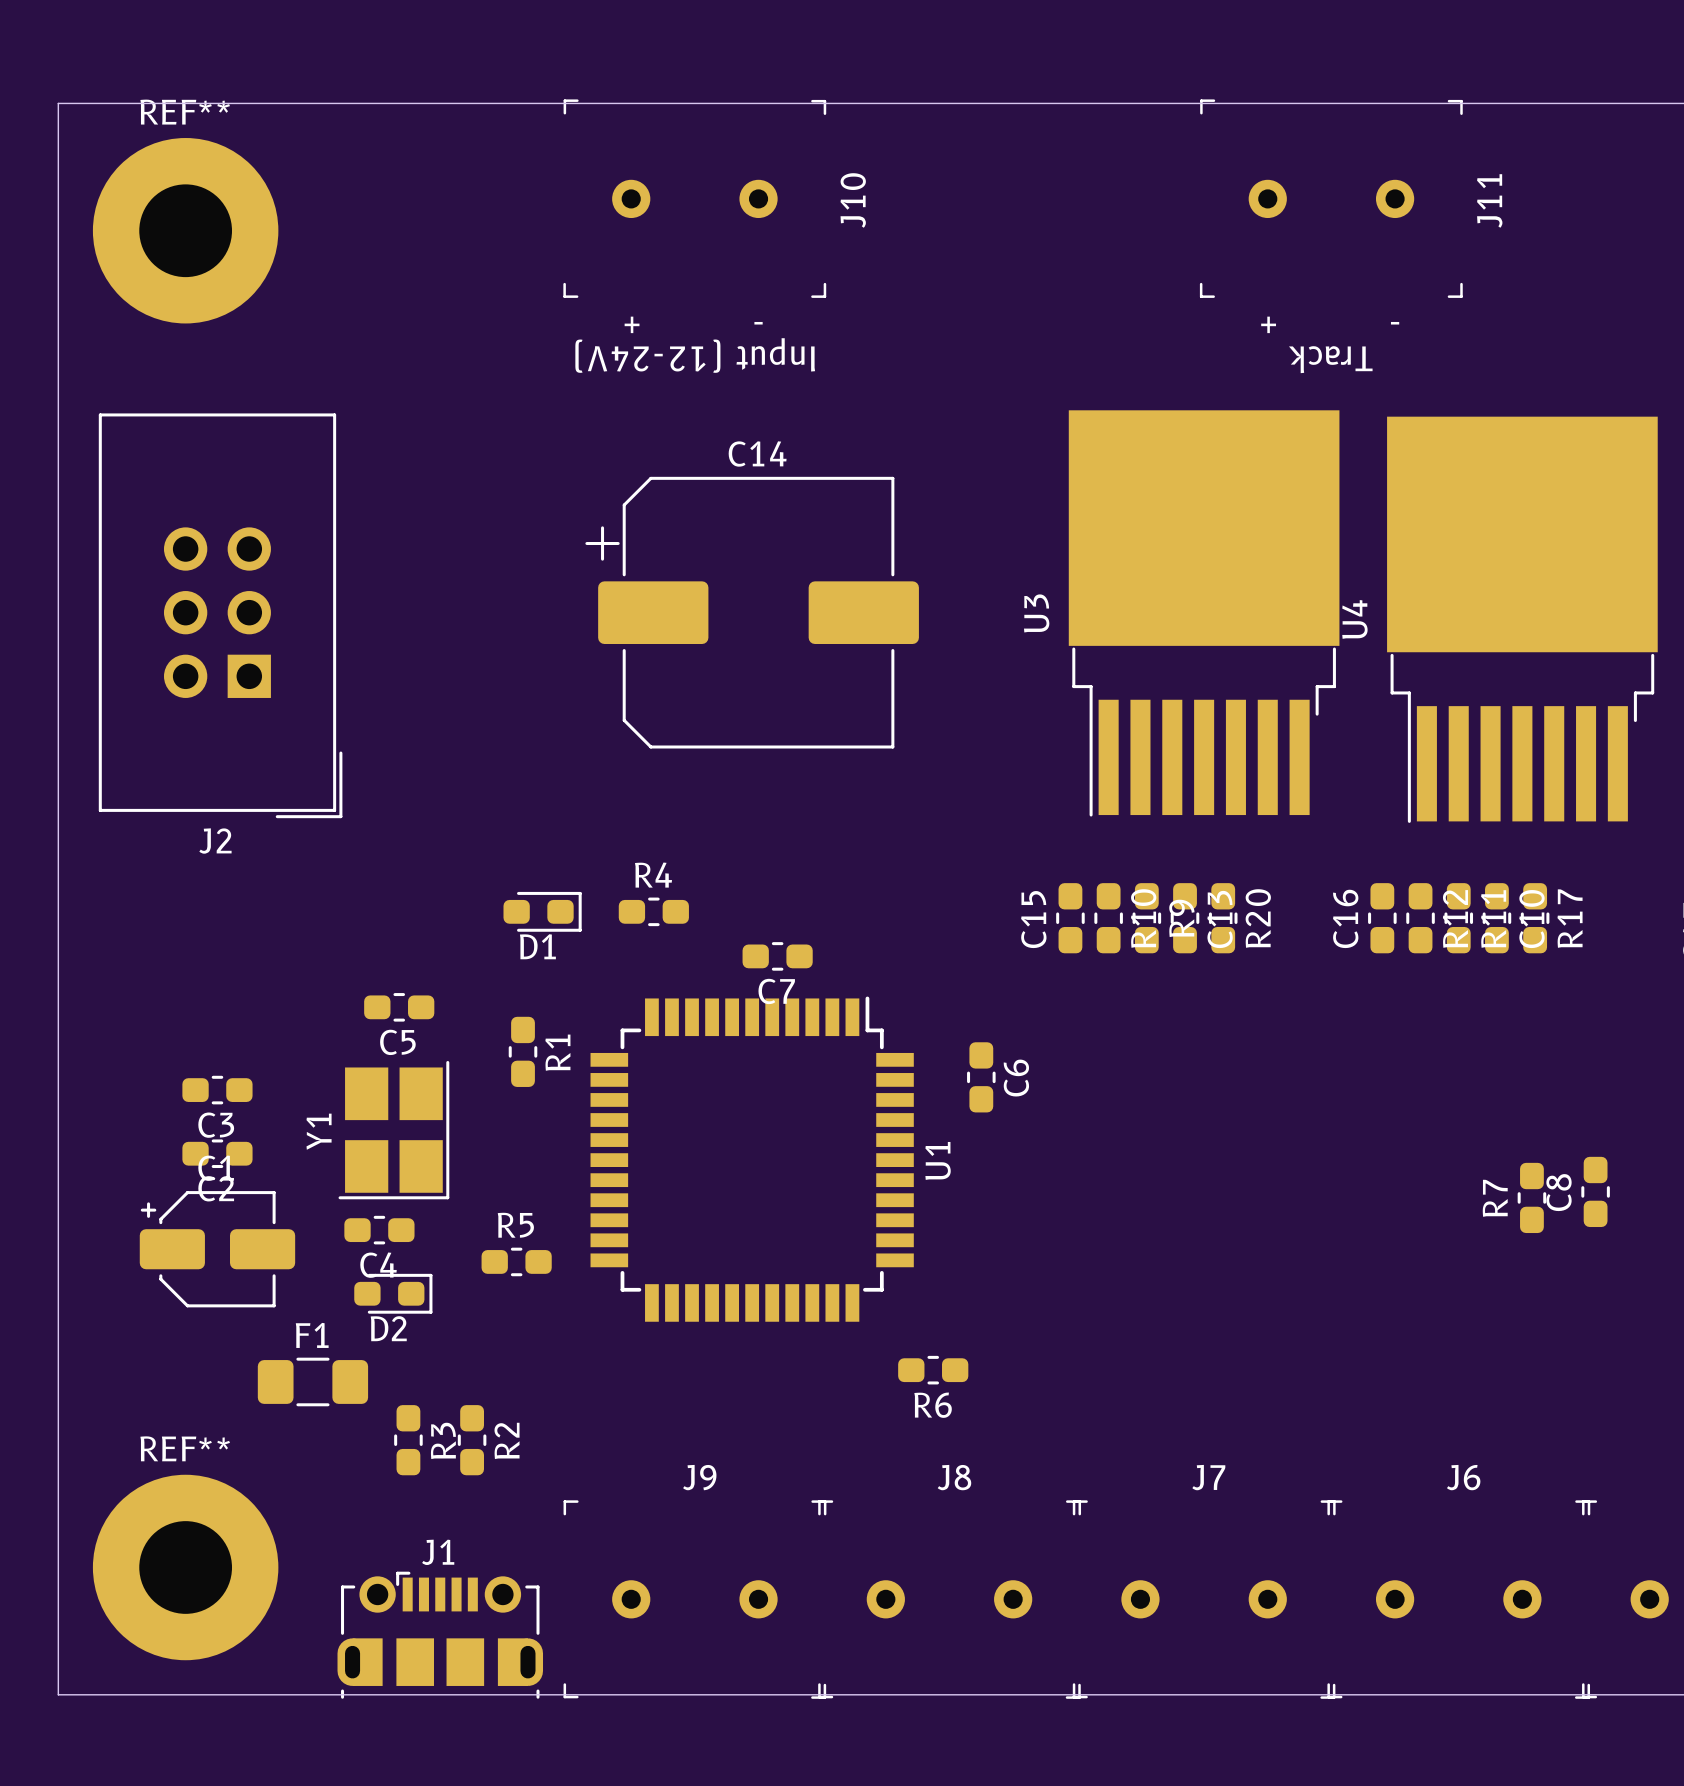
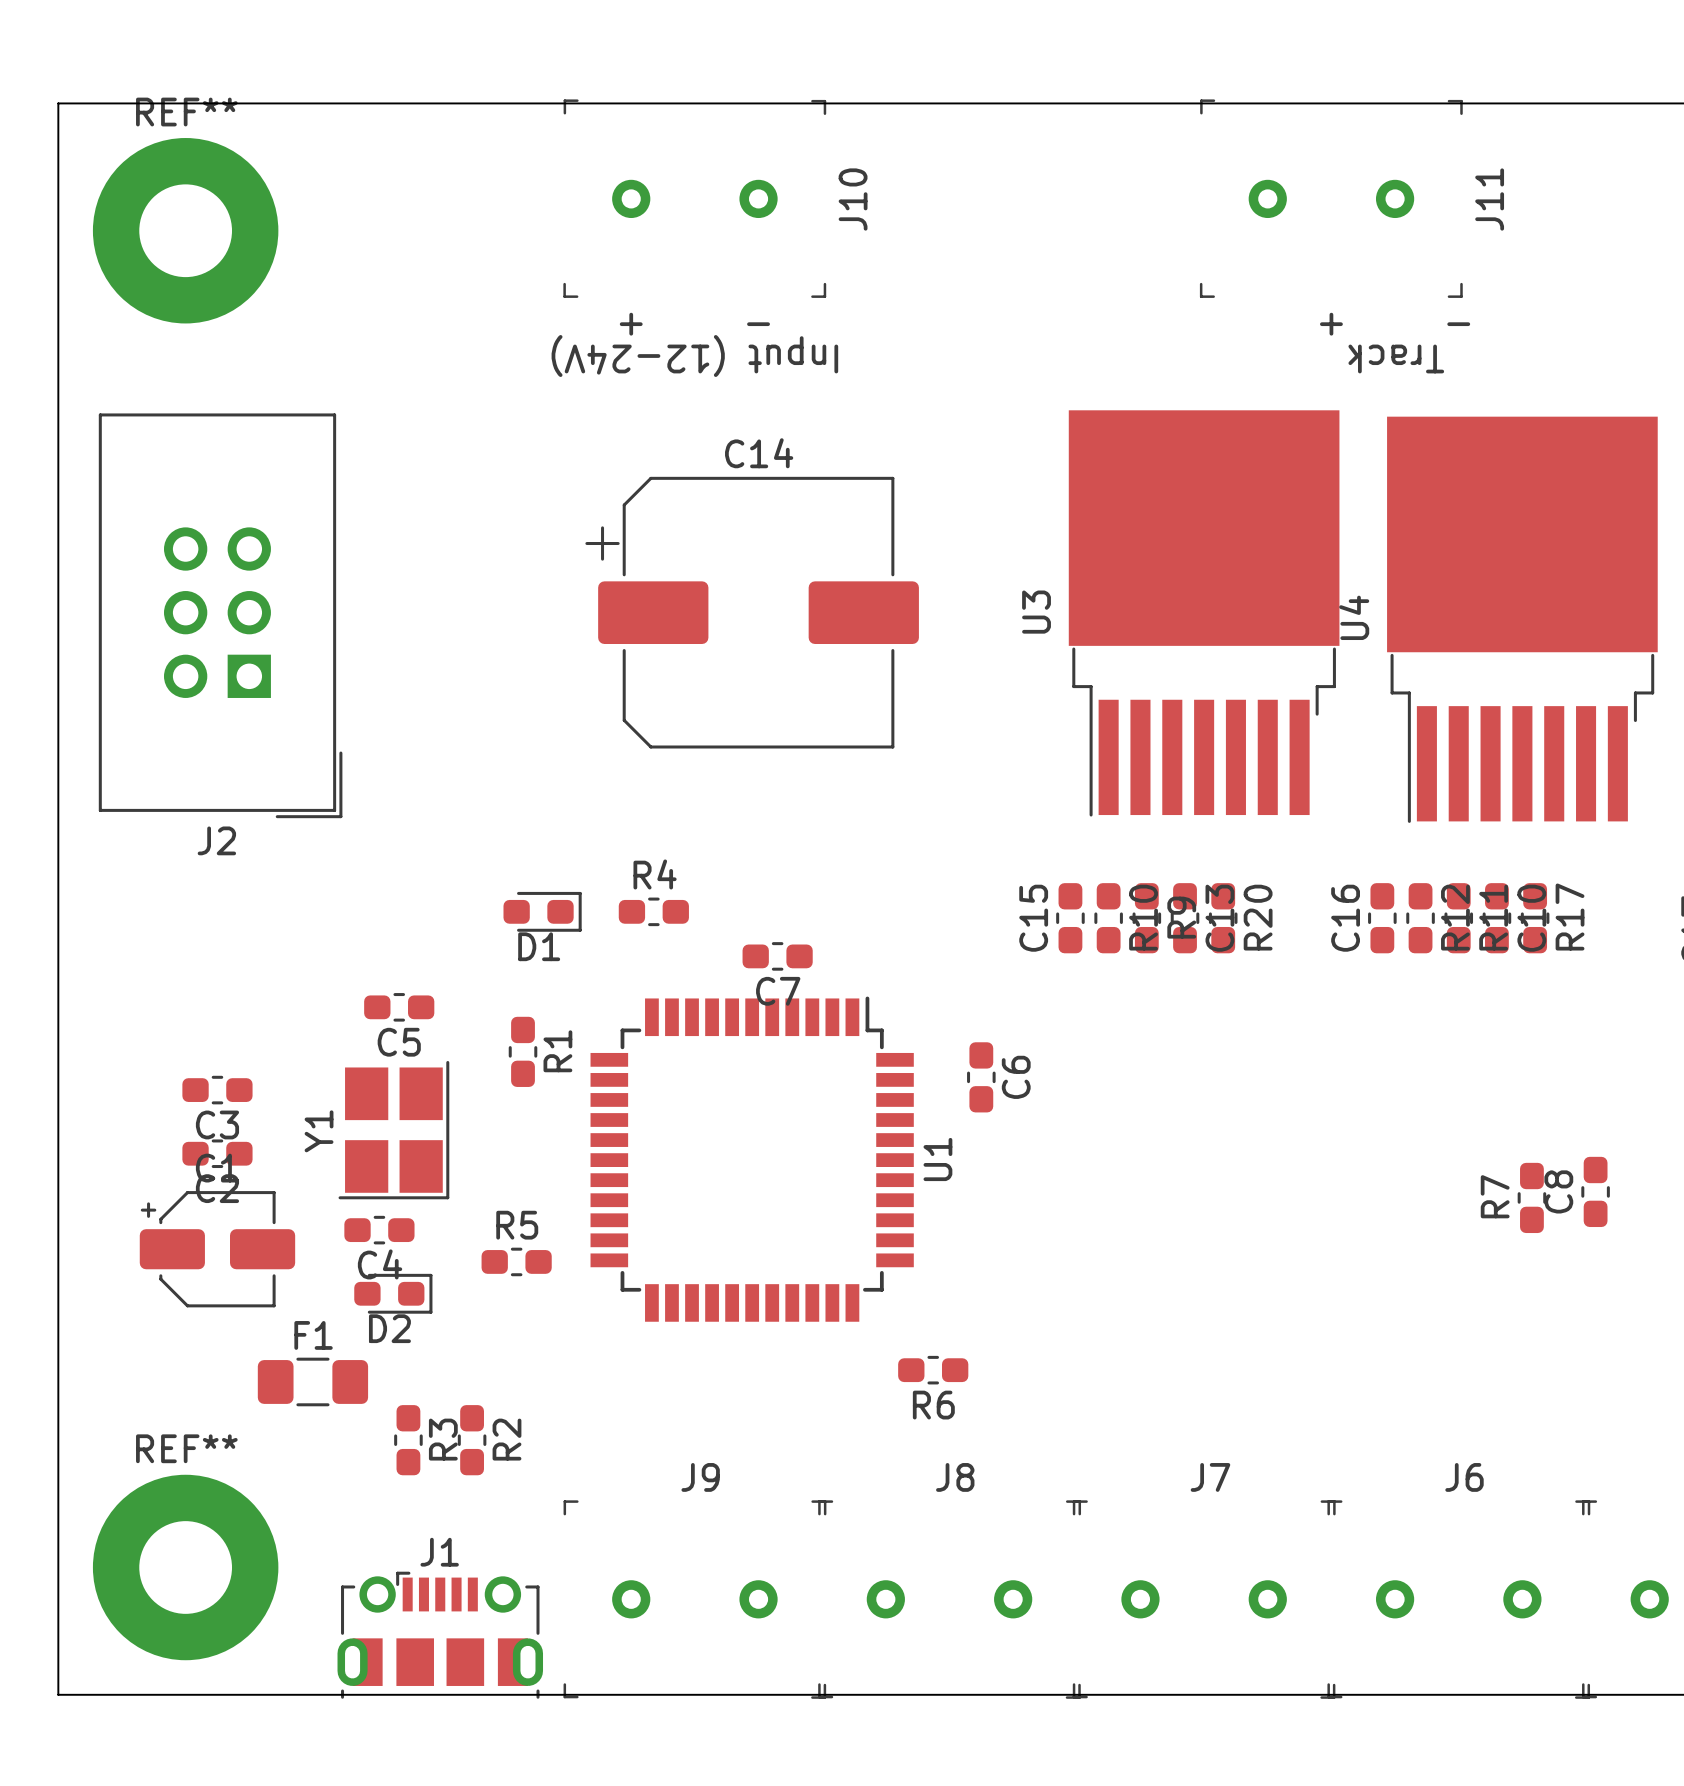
text position: - (1395, 323) -> - (1458, 324)
text position: + (1268, 324) -> + (1331, 324)
text position: Track (1330, 359) -> Track (1396, 358)

